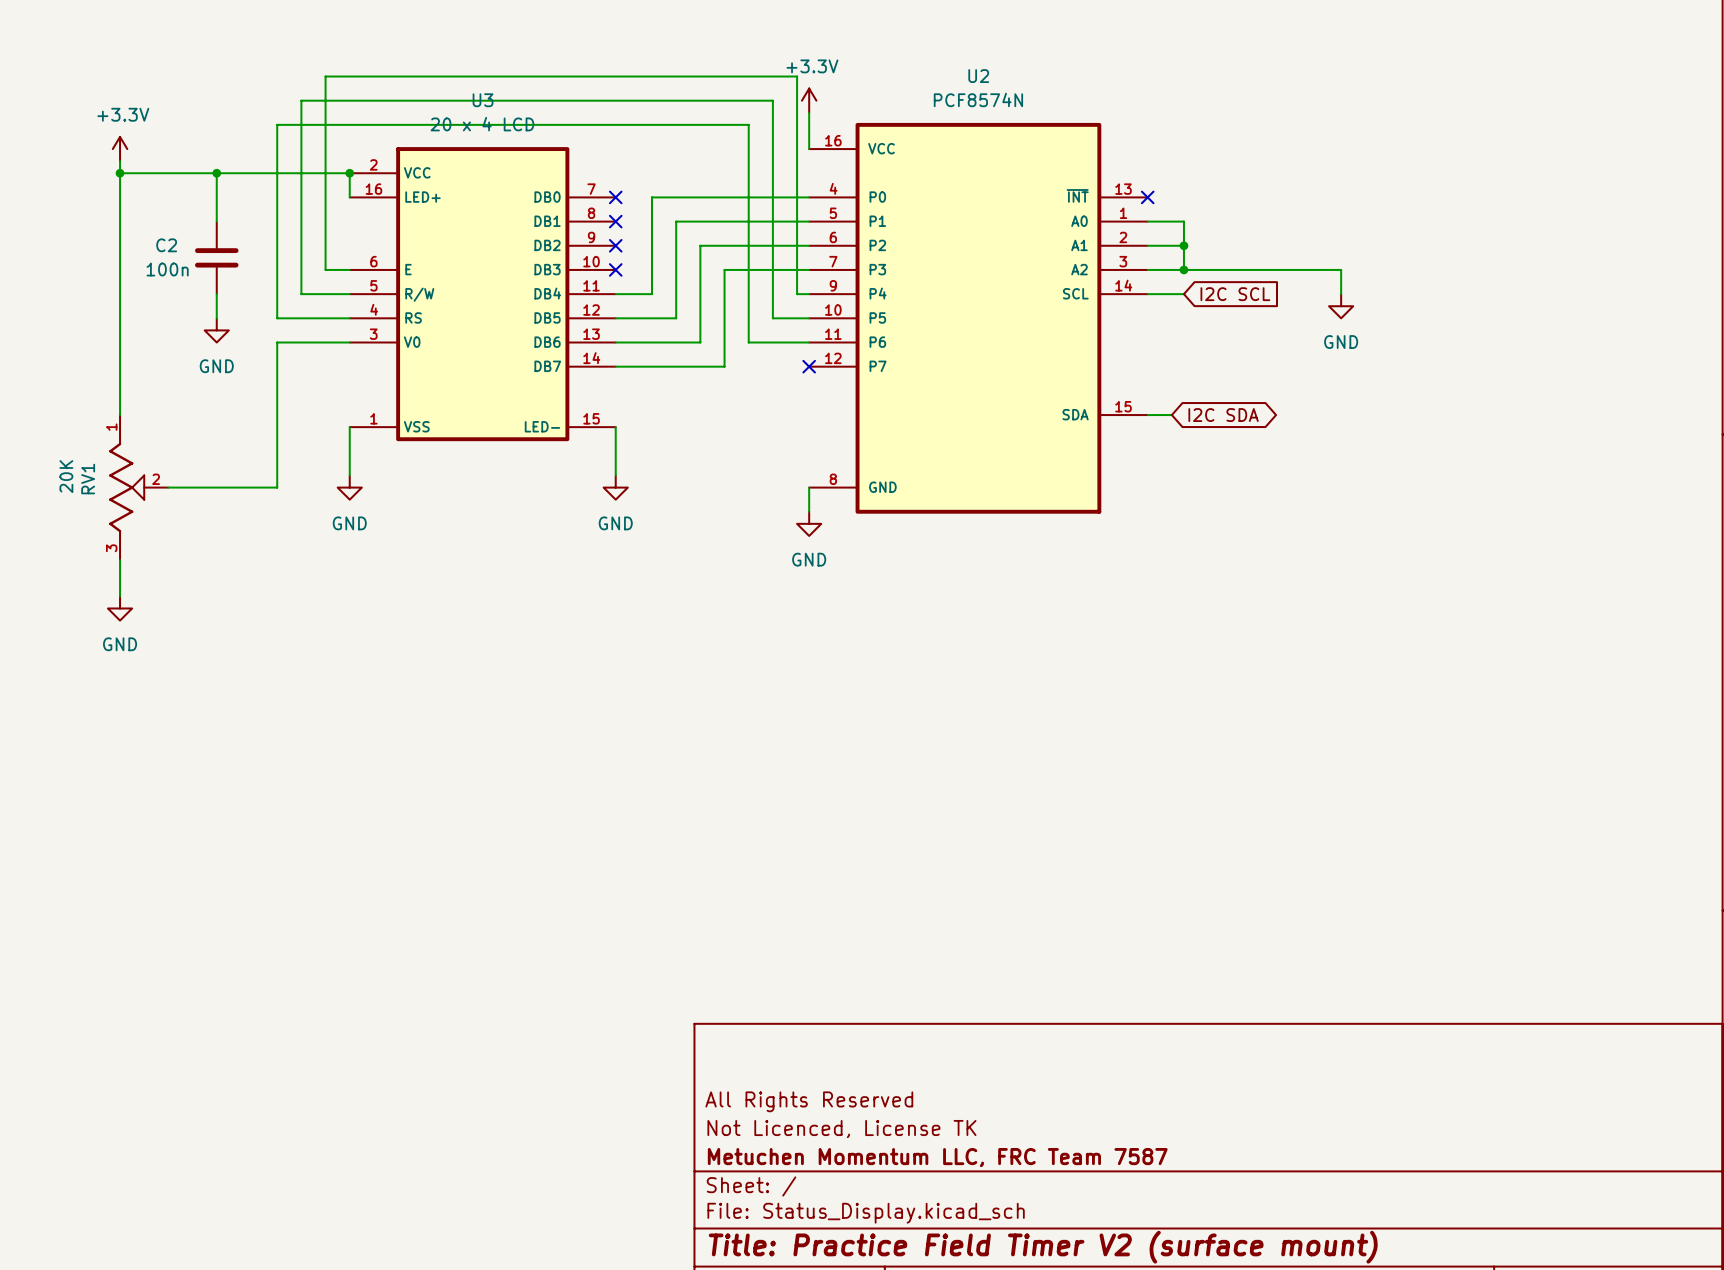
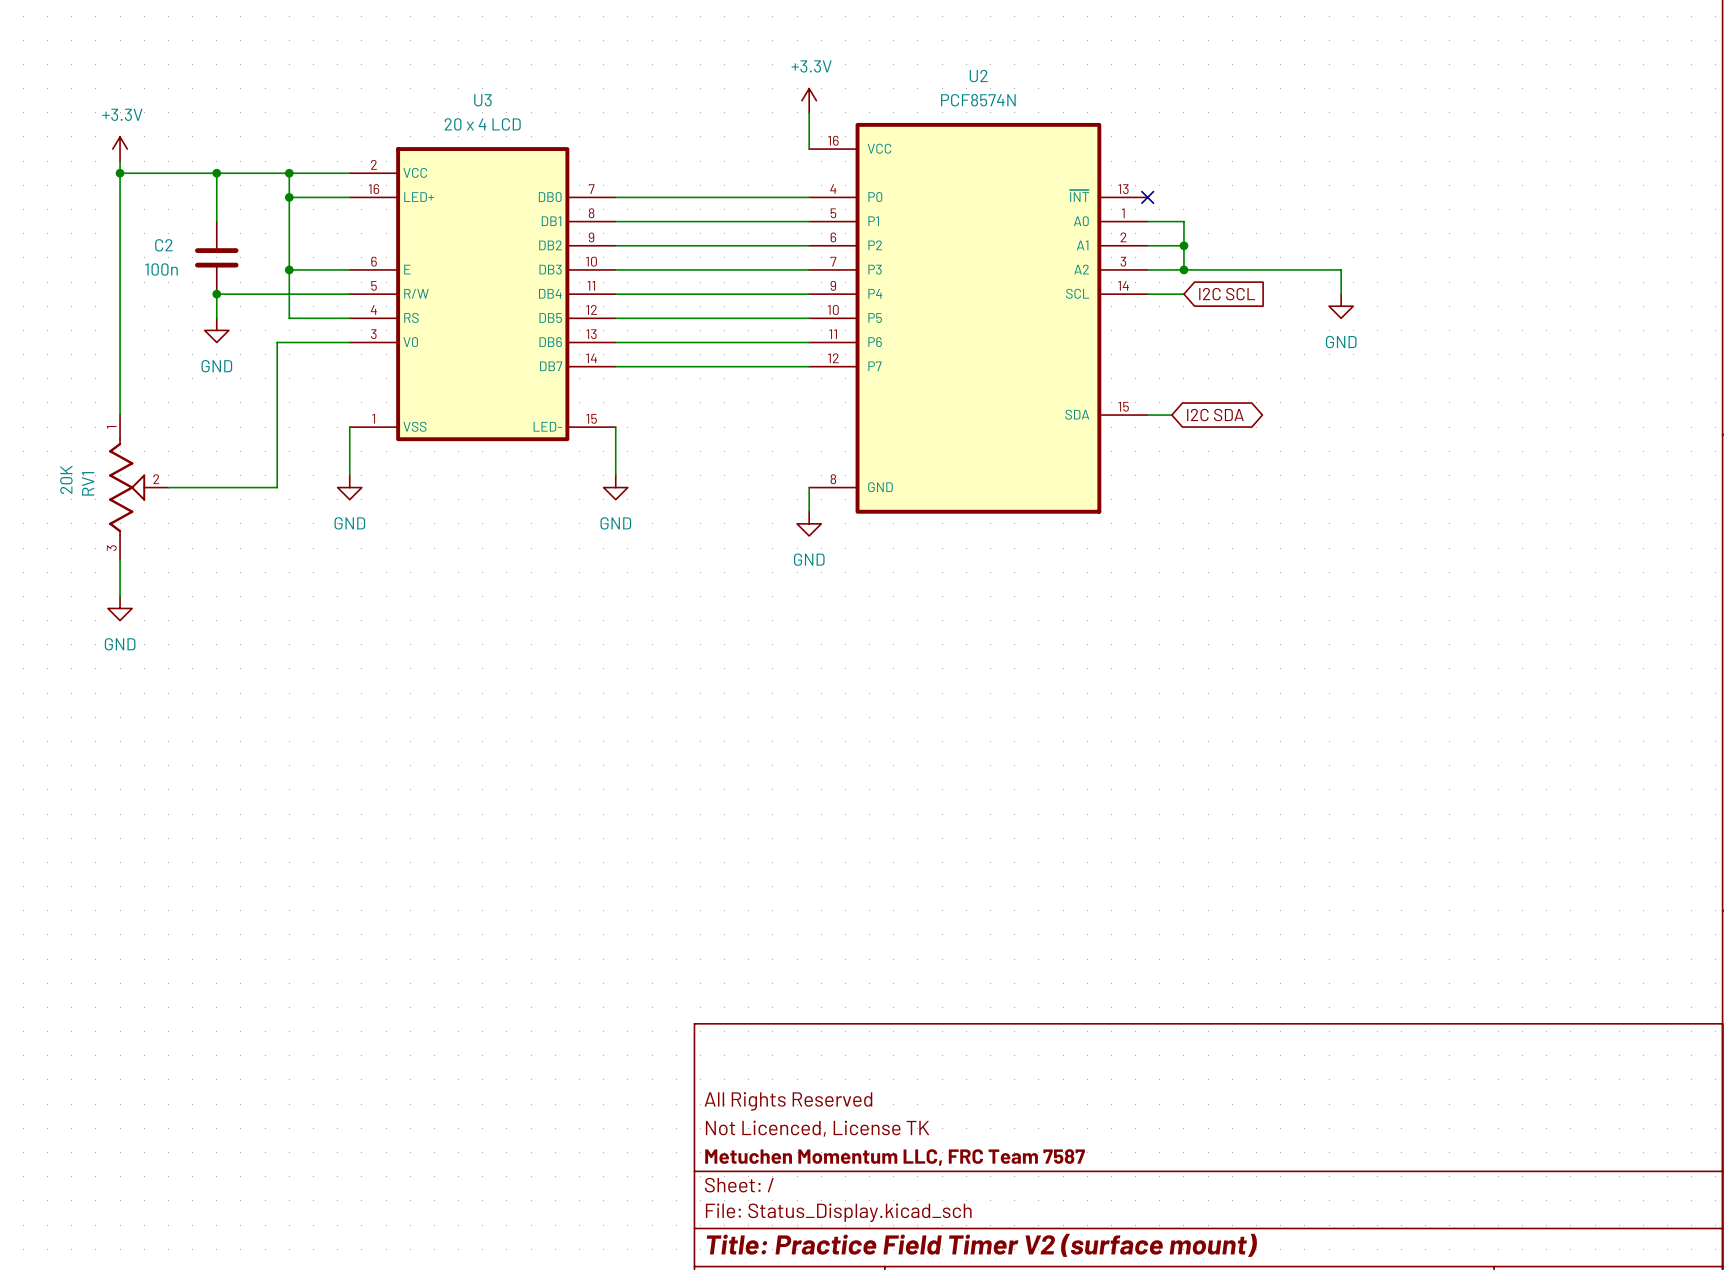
junction: none -> (289, 173)
wire: (349, 173) (349, 197) -> (289, 197) (349, 197)
junction: (349, 173) -> none
junction: none -> (289, 197)
no-connect mark: (615, 197) -> none
wire: (652, 197) (652, 294) -> (652, 197) (615, 197)
no-connect mark: (615, 221) -> none
wire: (676, 221) (676, 318) -> (676, 221) (615, 221)
wire: none -> (615, 245) (700, 245)
no-connect mark: (615, 245) -> none
wire: (700, 245) (700, 342) -> (748, 342) (700, 342)
wire: none -> (289, 269) (325, 269)
junction: none -> (289, 269)
wire: (325, 269) (325, 76) (797, 76) (797, 294) -> (652, 294) (797, 294)
wire: none -> (615, 269) (724, 269)
no-connect mark: (615, 269) -> none
wire: (724, 269) (724, 366) -> (809, 366) (724, 366)
wire: none -> (216, 294) (301, 294)
junction: none -> (216, 294)
wire: (301, 294) (301, 100) (772, 100) (772, 318) -> (676, 318) (772, 318)
wire: (289, 318) (277, 318) (277, 124) (748, 124) (748, 342) -> (289, 318) (289, 173)
no-connect mark: (809, 366) -> none

